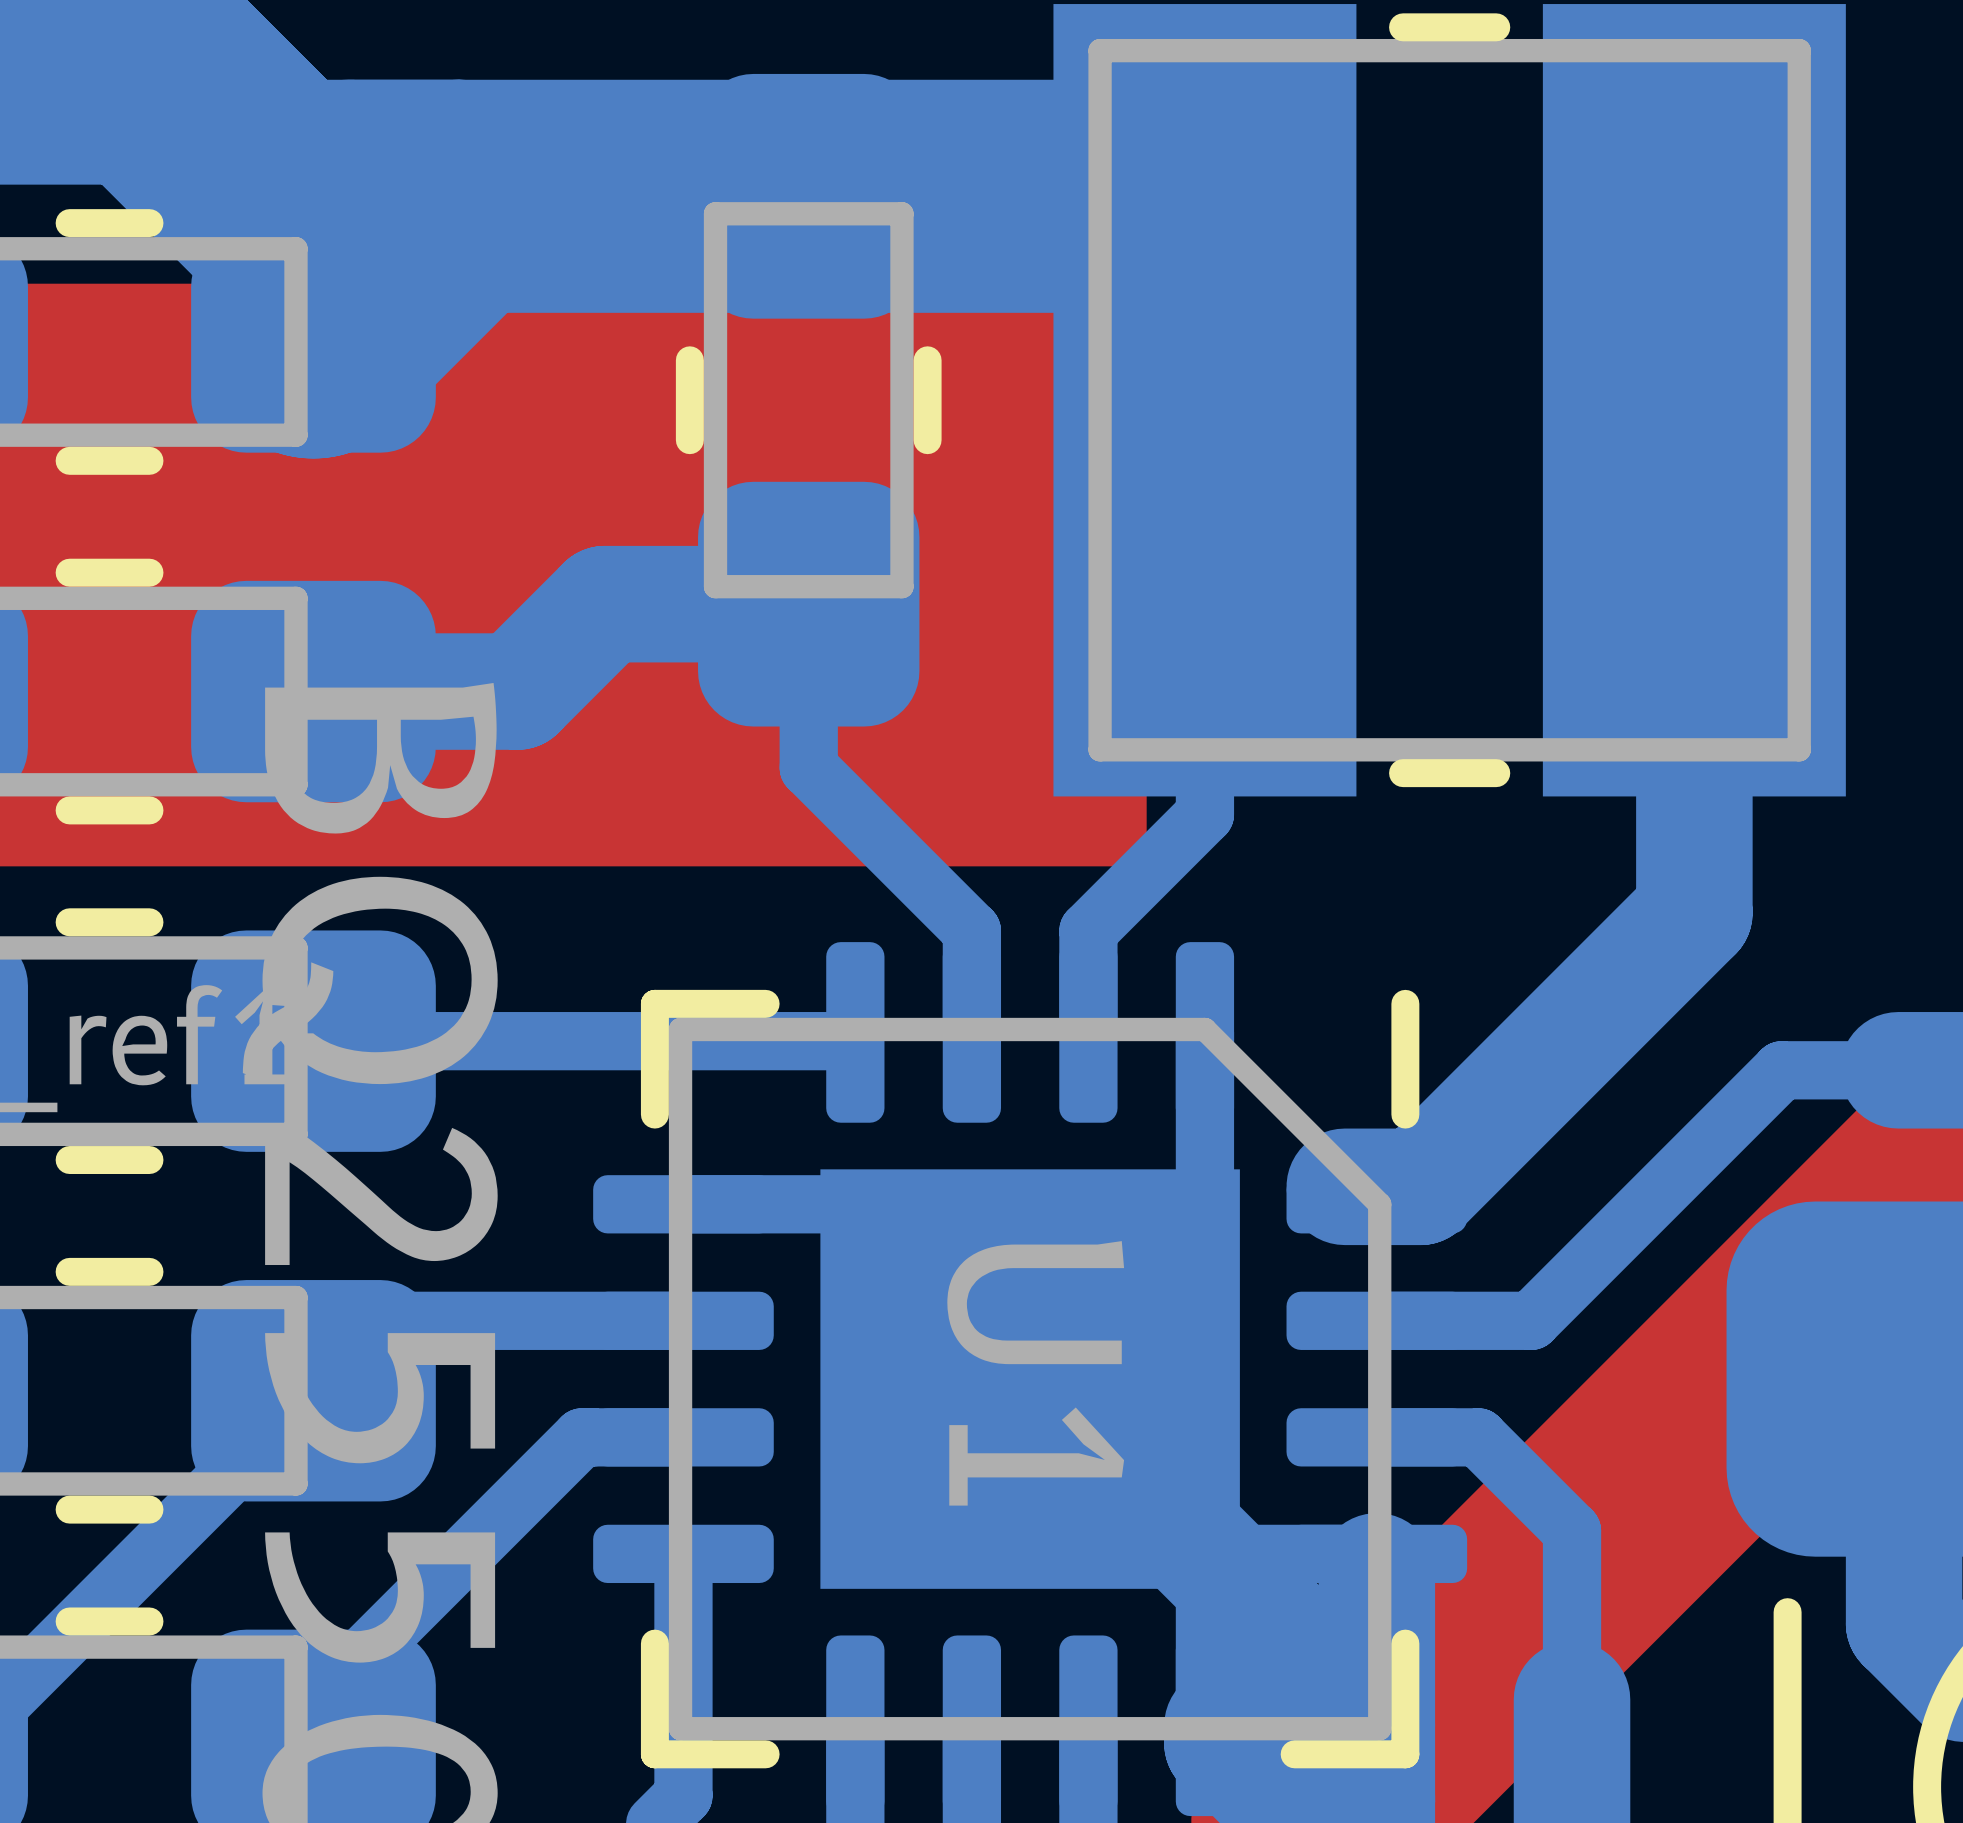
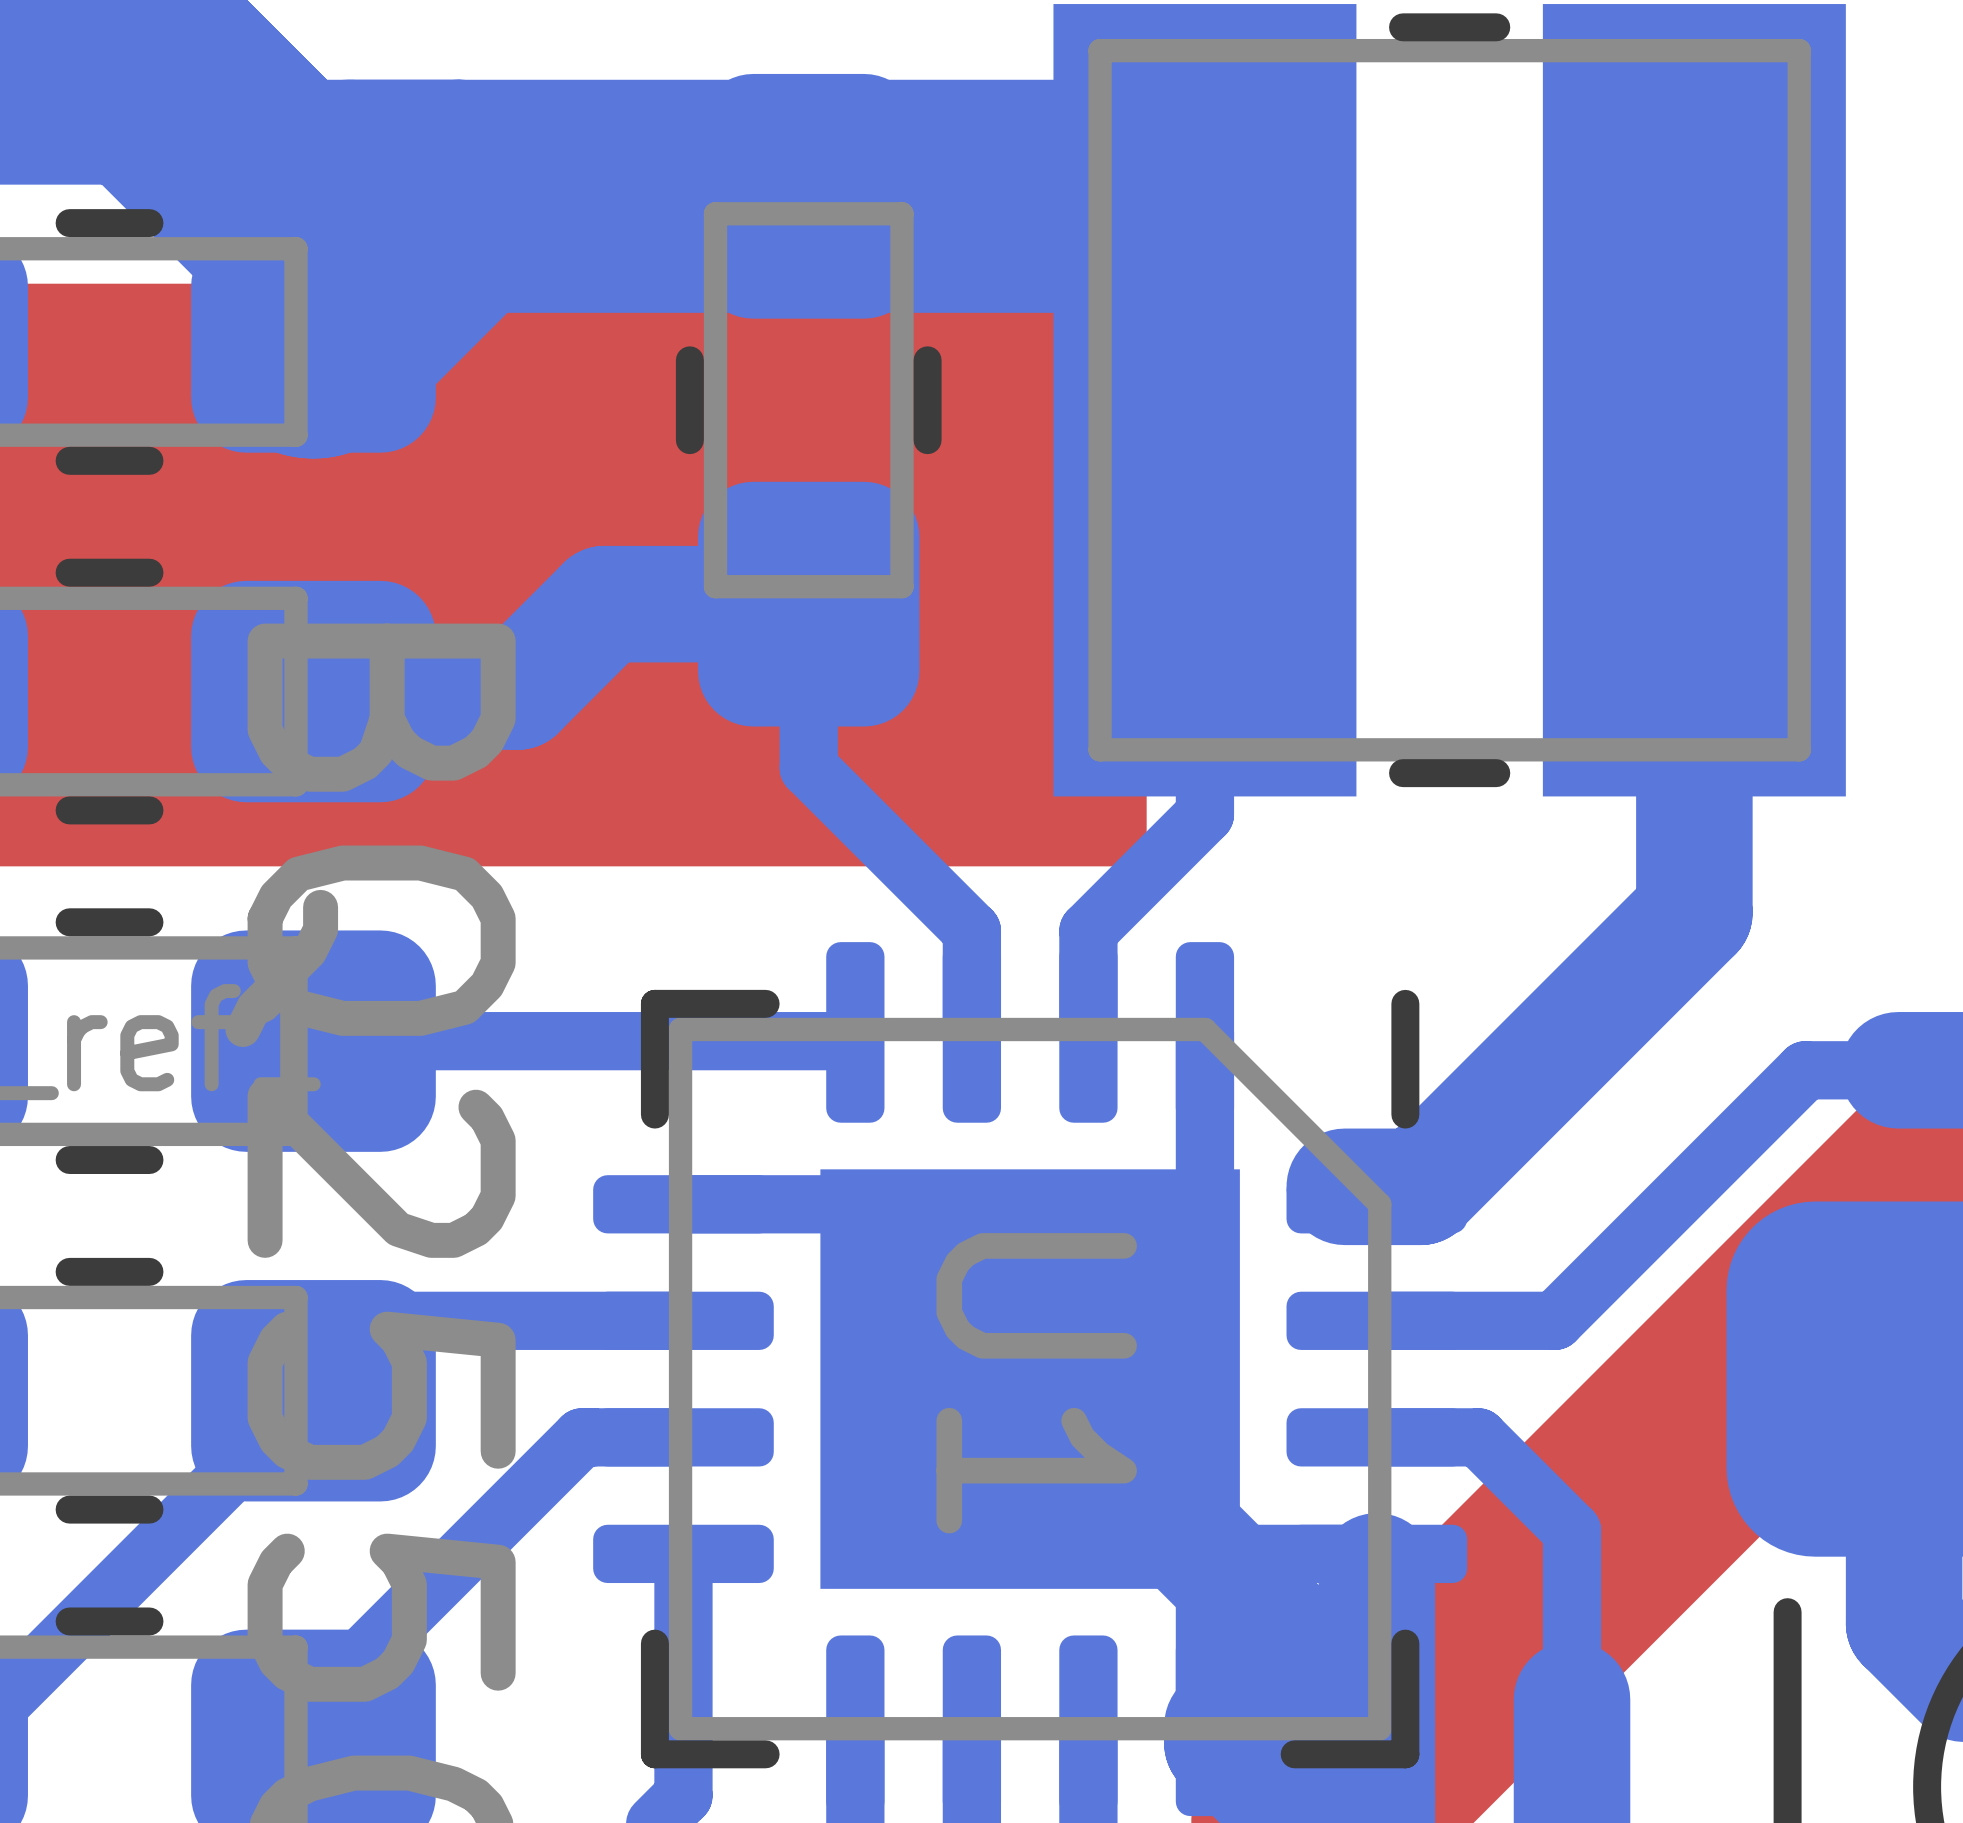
bottom track: (1805, 1070) (1781, 1070) (1531, 1320) -> (1805, 1070) (1554, 1320) (1531, 1320)

